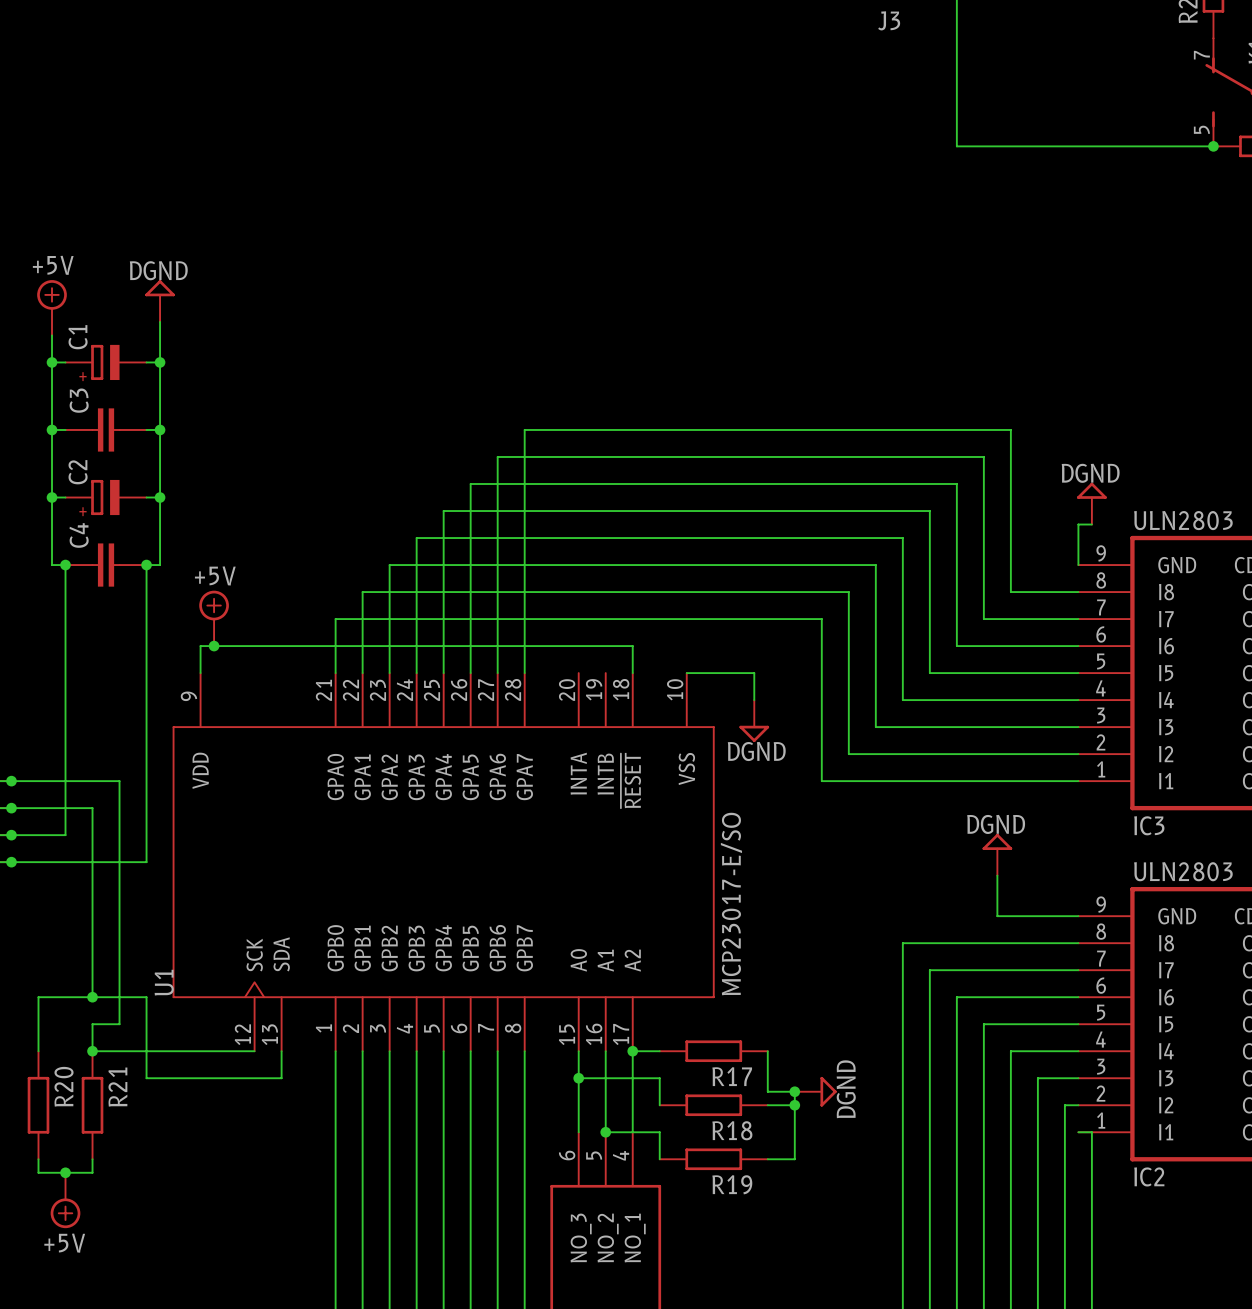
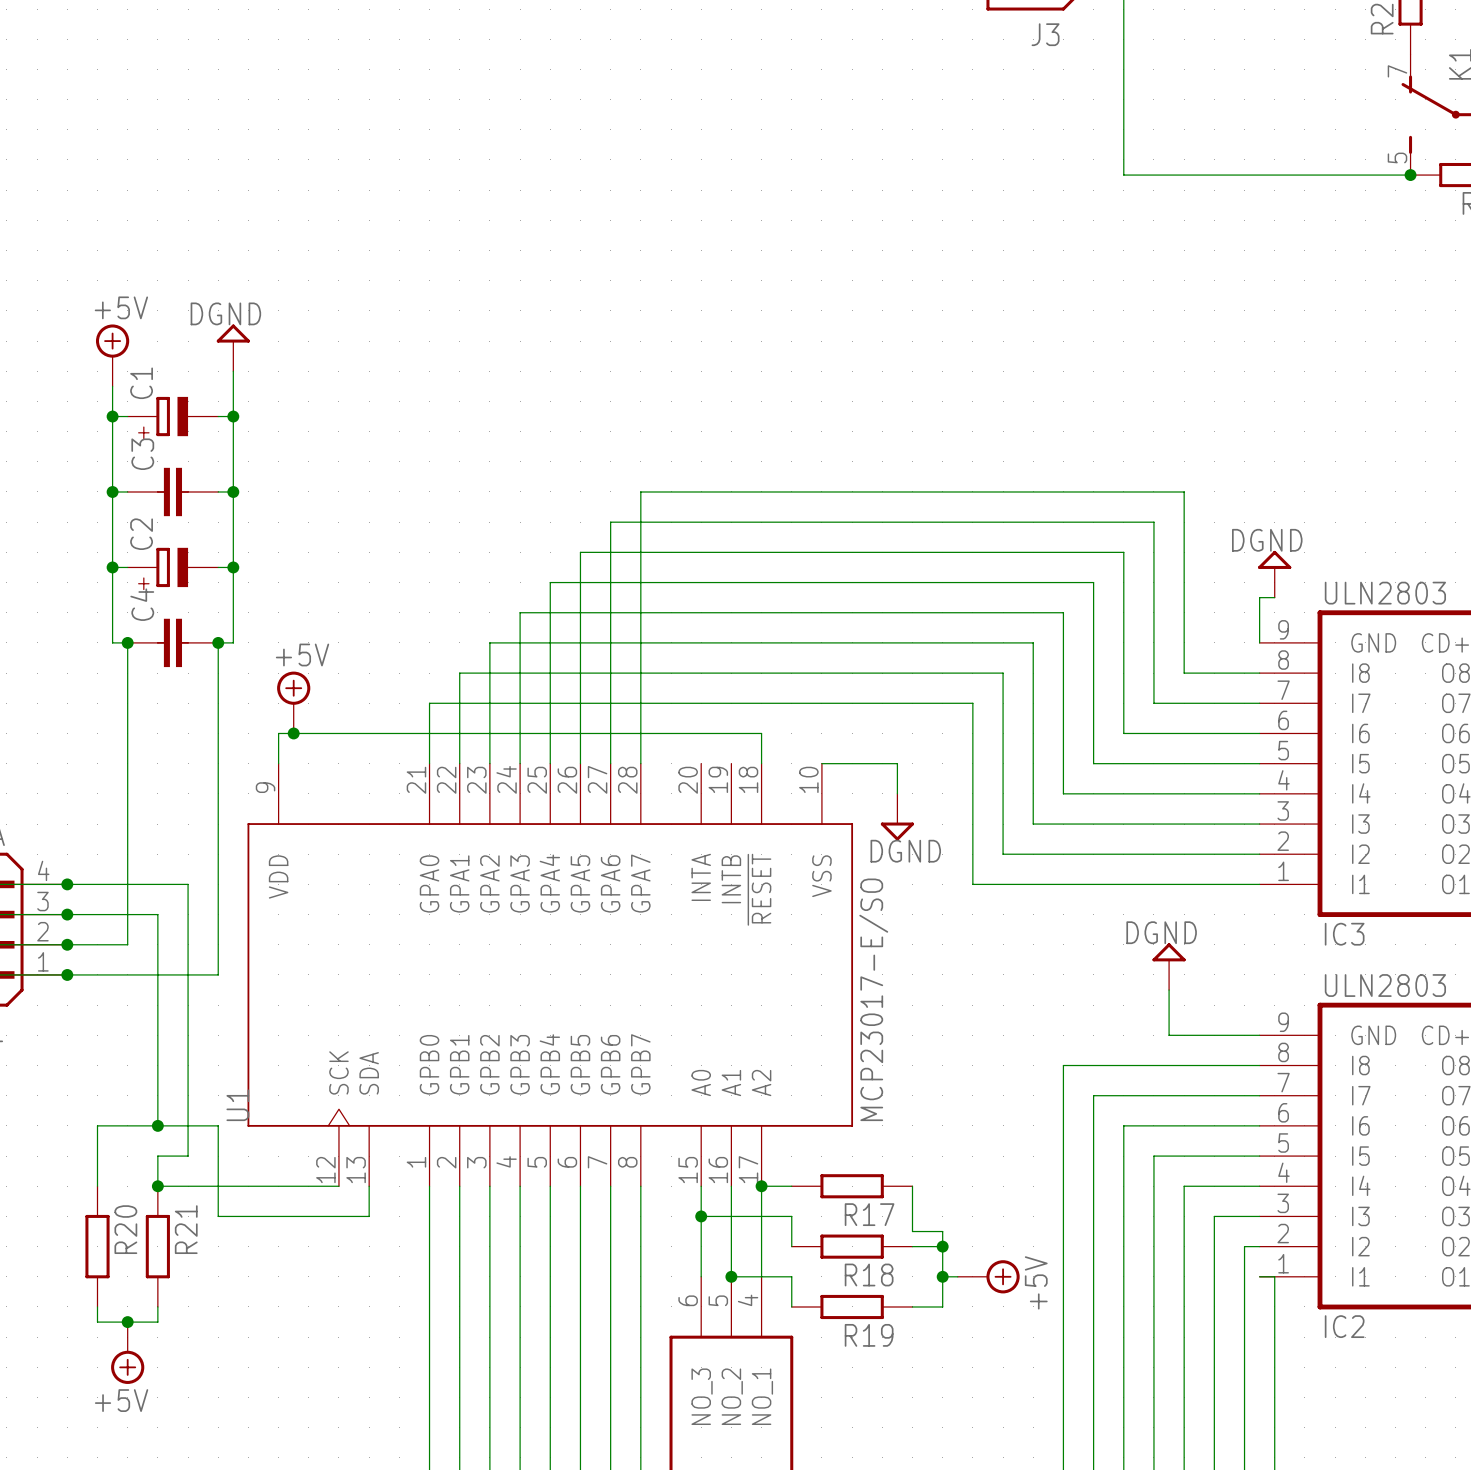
junction position: (794, 1091) -> (942, 1276)
power symbol: DGND (815, 1091) -> none
wire: none -> (942, 1276) (957, 1276)
power symbol: none -> +5V (988, 1276)

